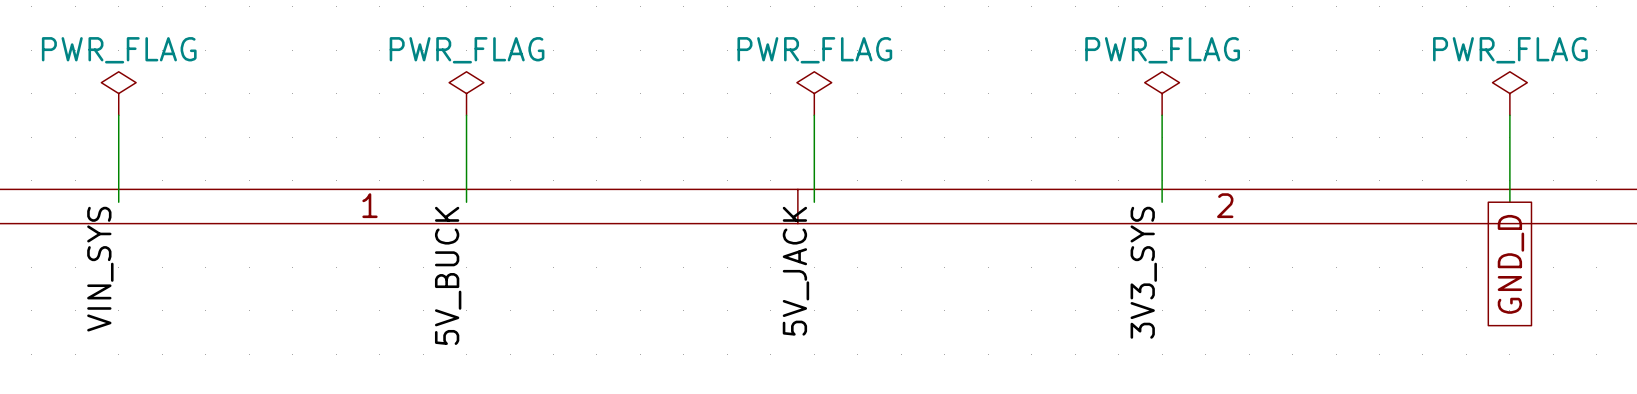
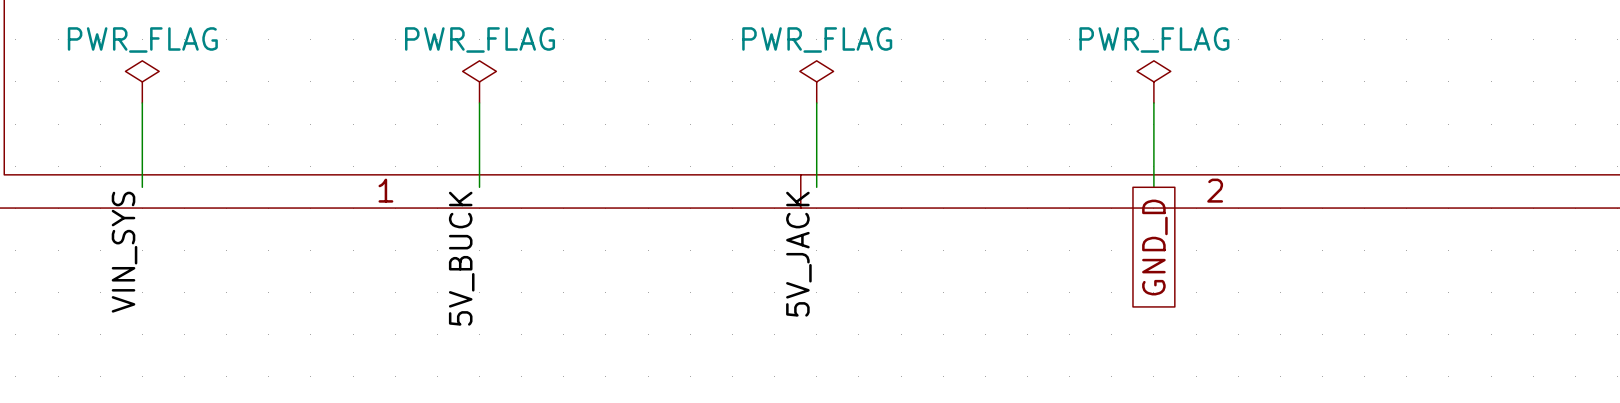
power symbol: PWR_FLAG (1509, 93) -> none
wire: (1509, 115) (1509, 202) -> none
global label position: GND_D (1510, 264) -> GND_D (1154, 247)
label: 3V3_SYS (1143, 272) -> none

